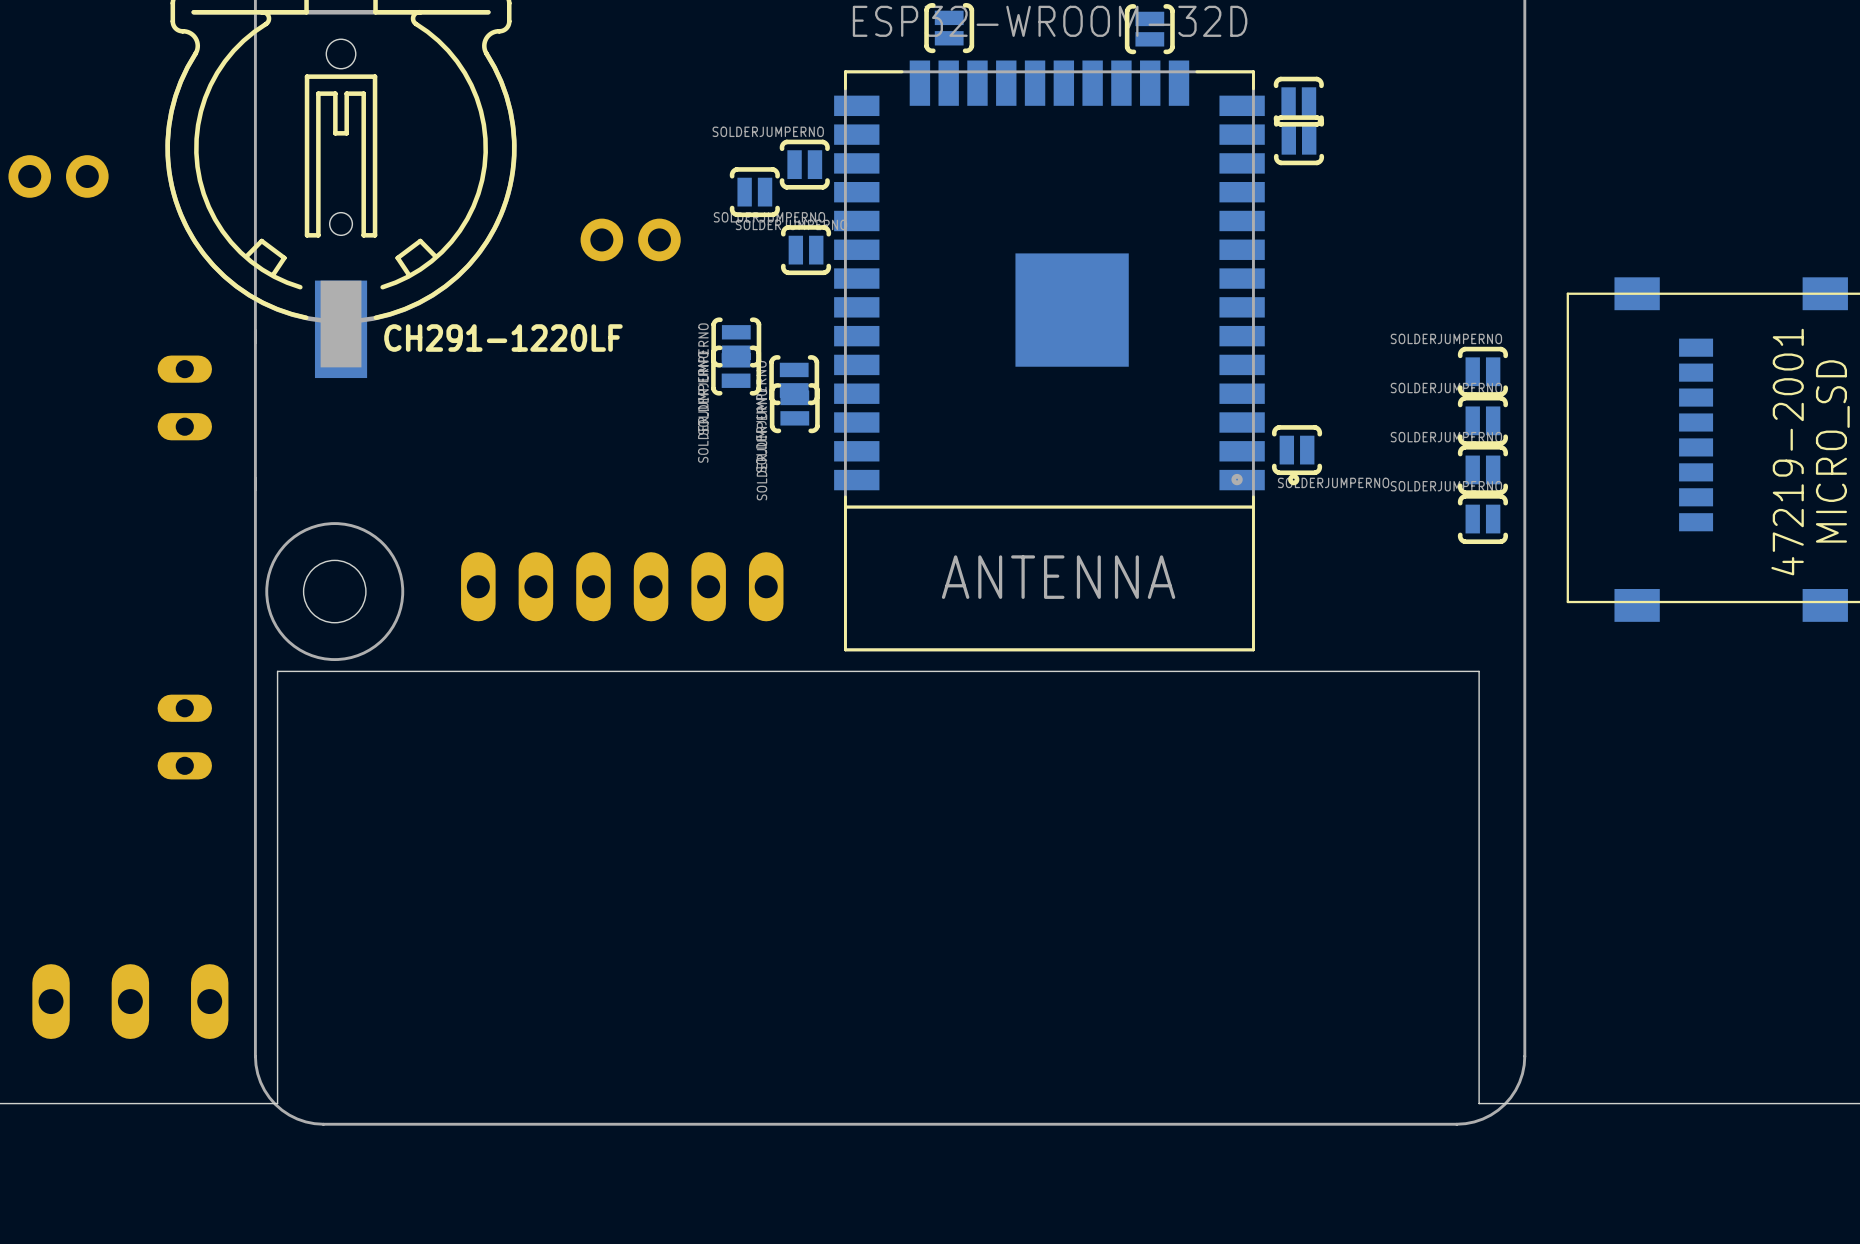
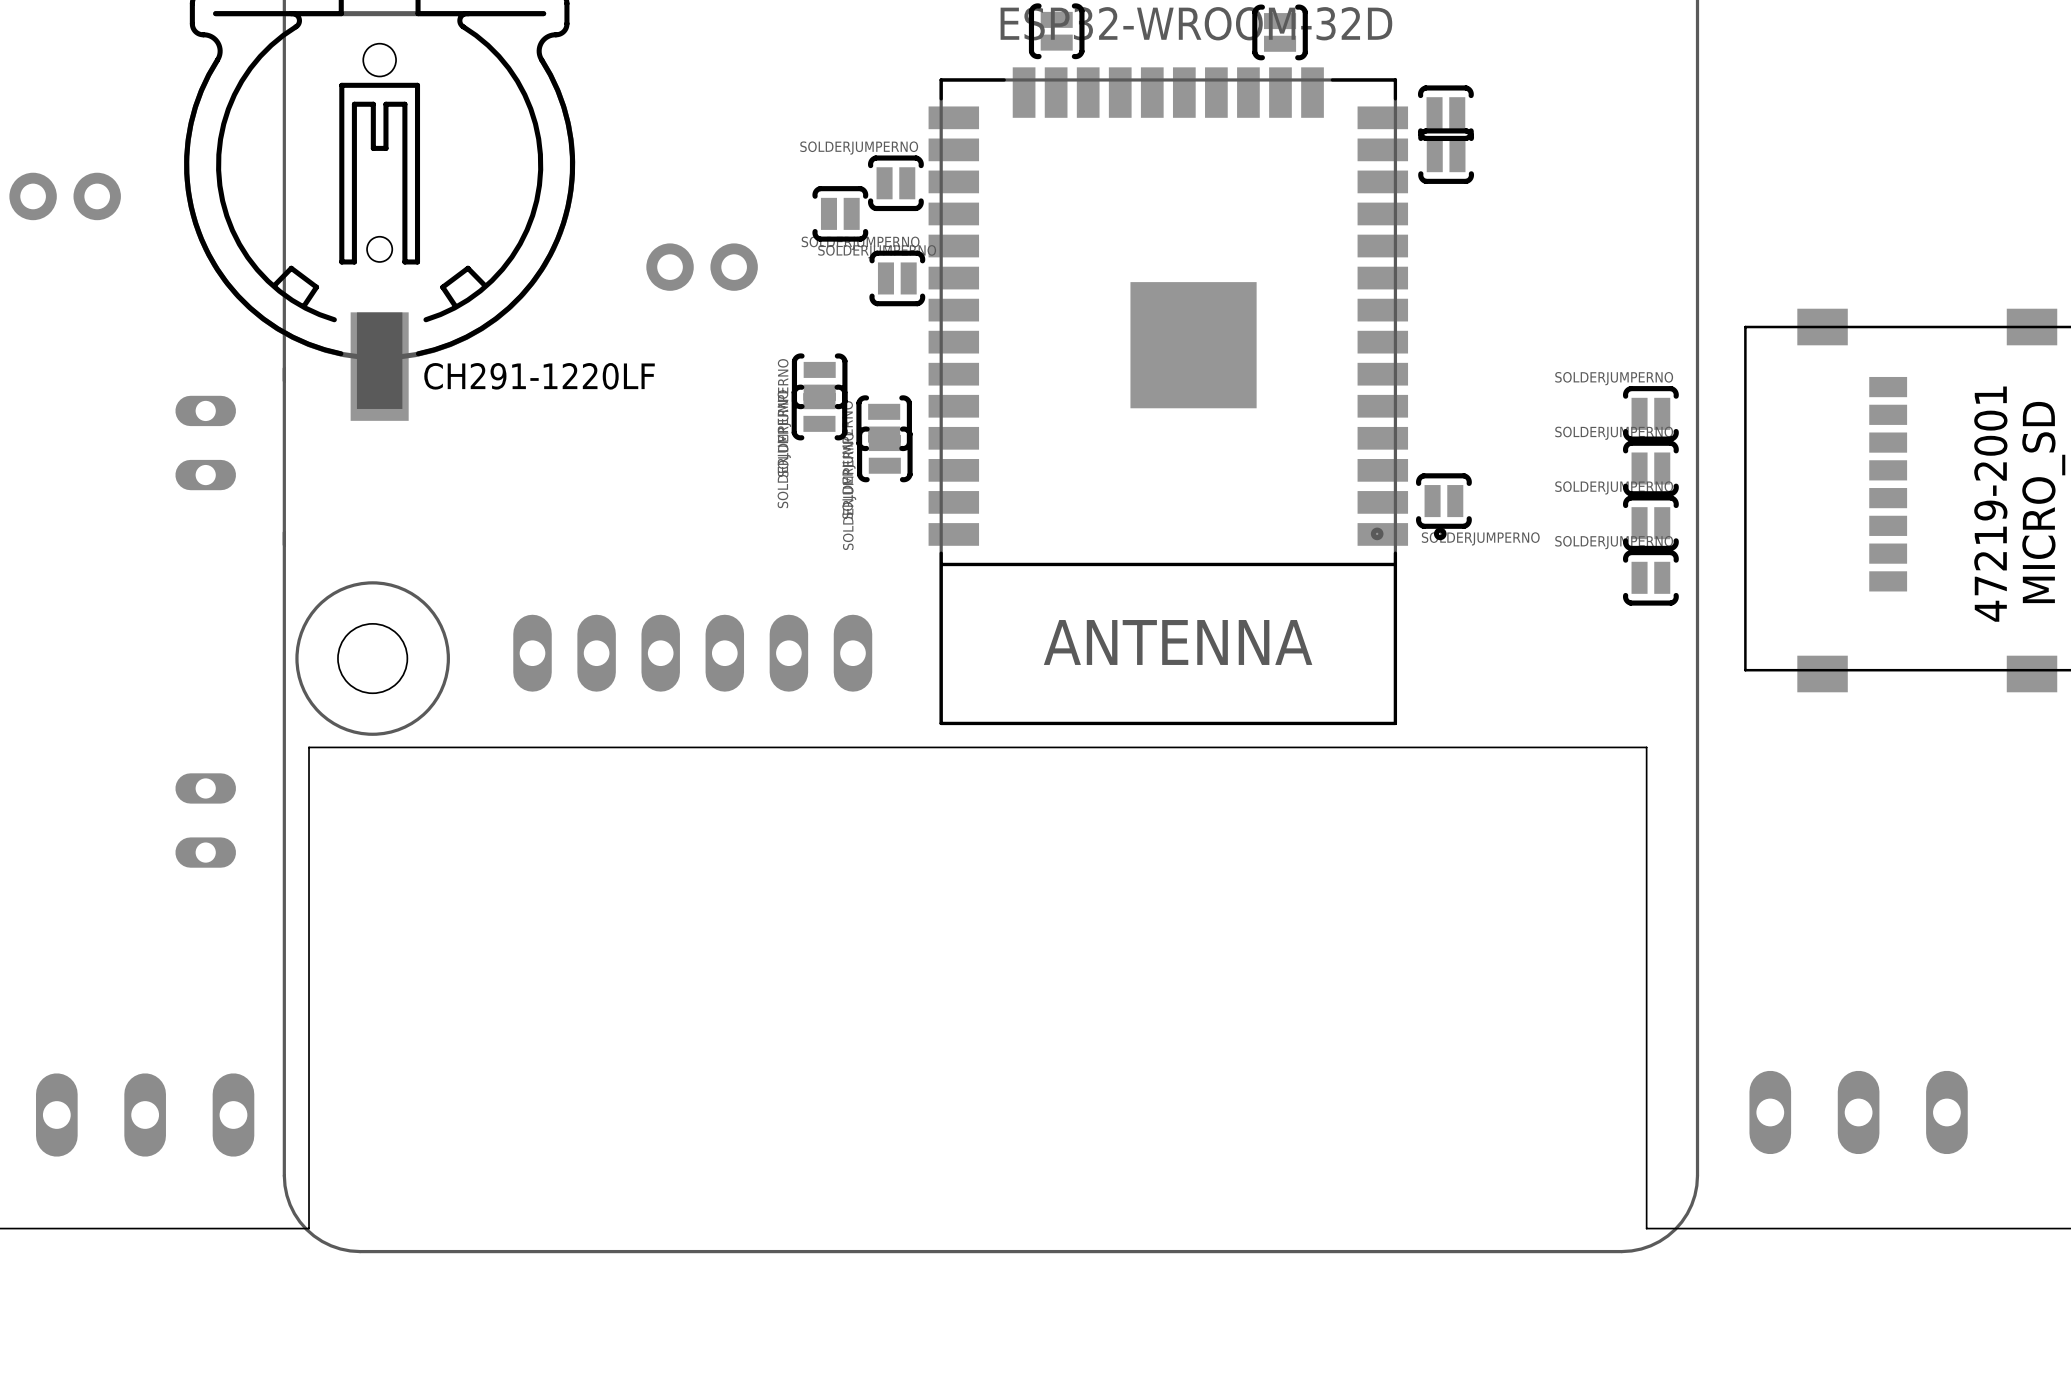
part: none -> (1858, 1112)

